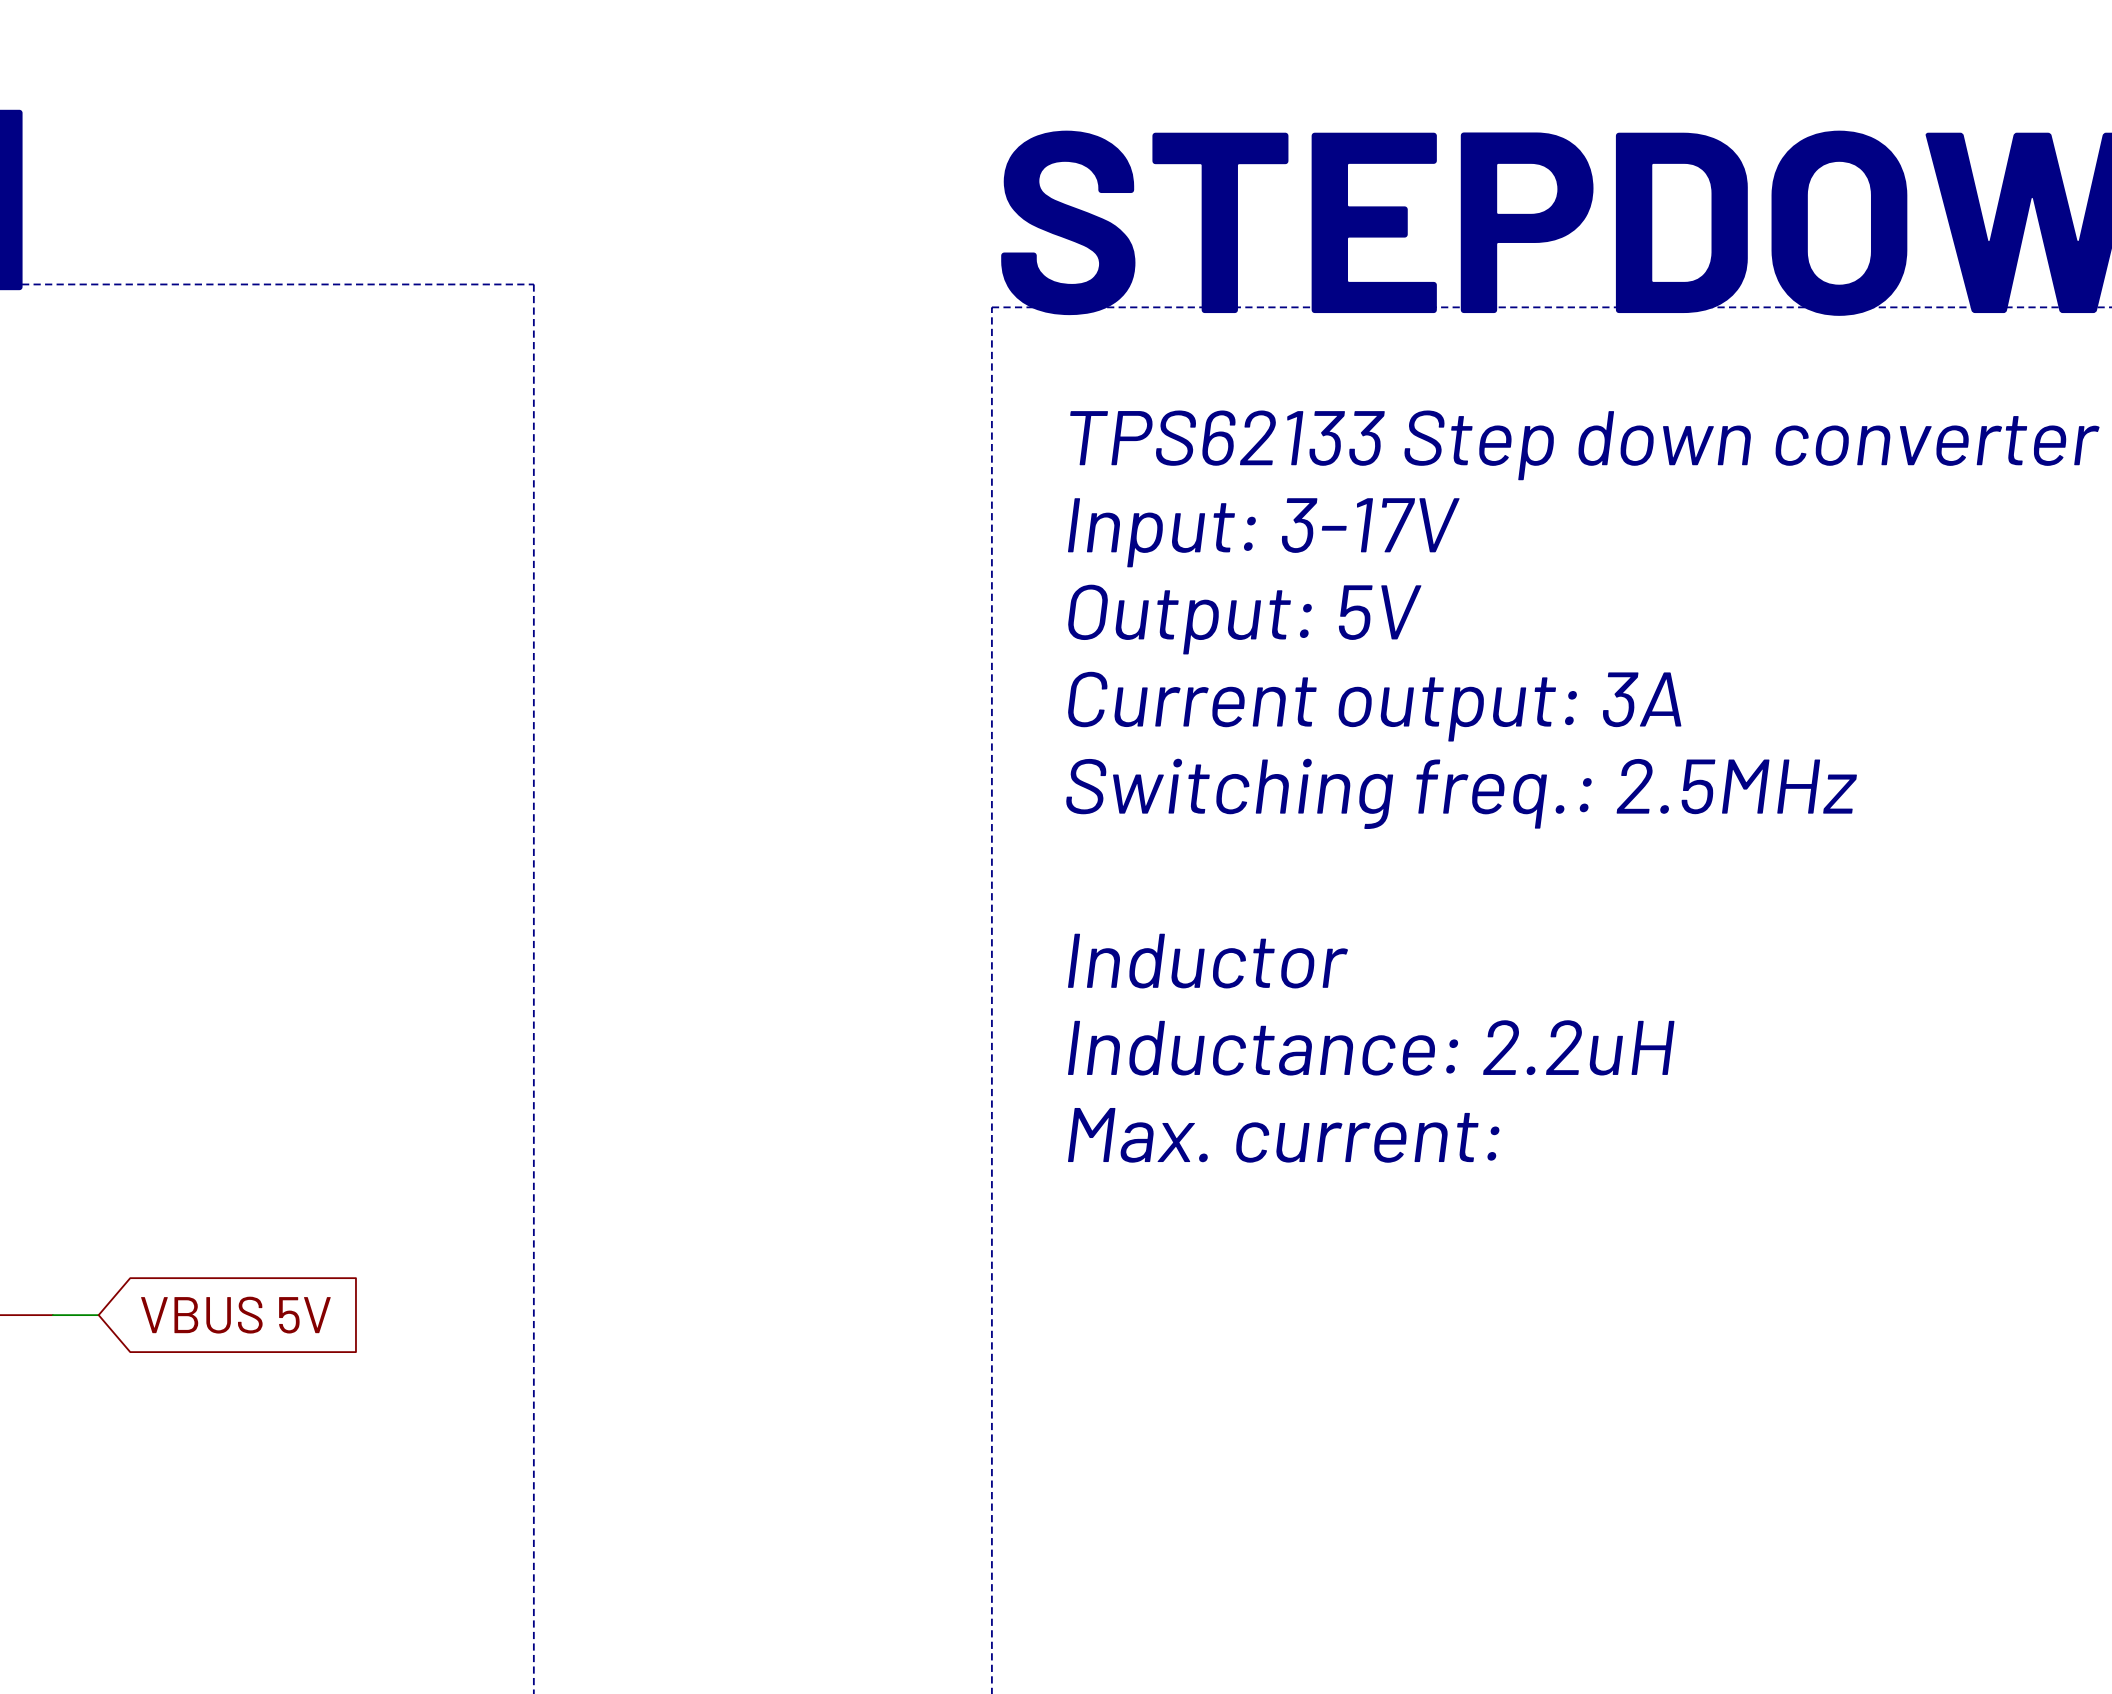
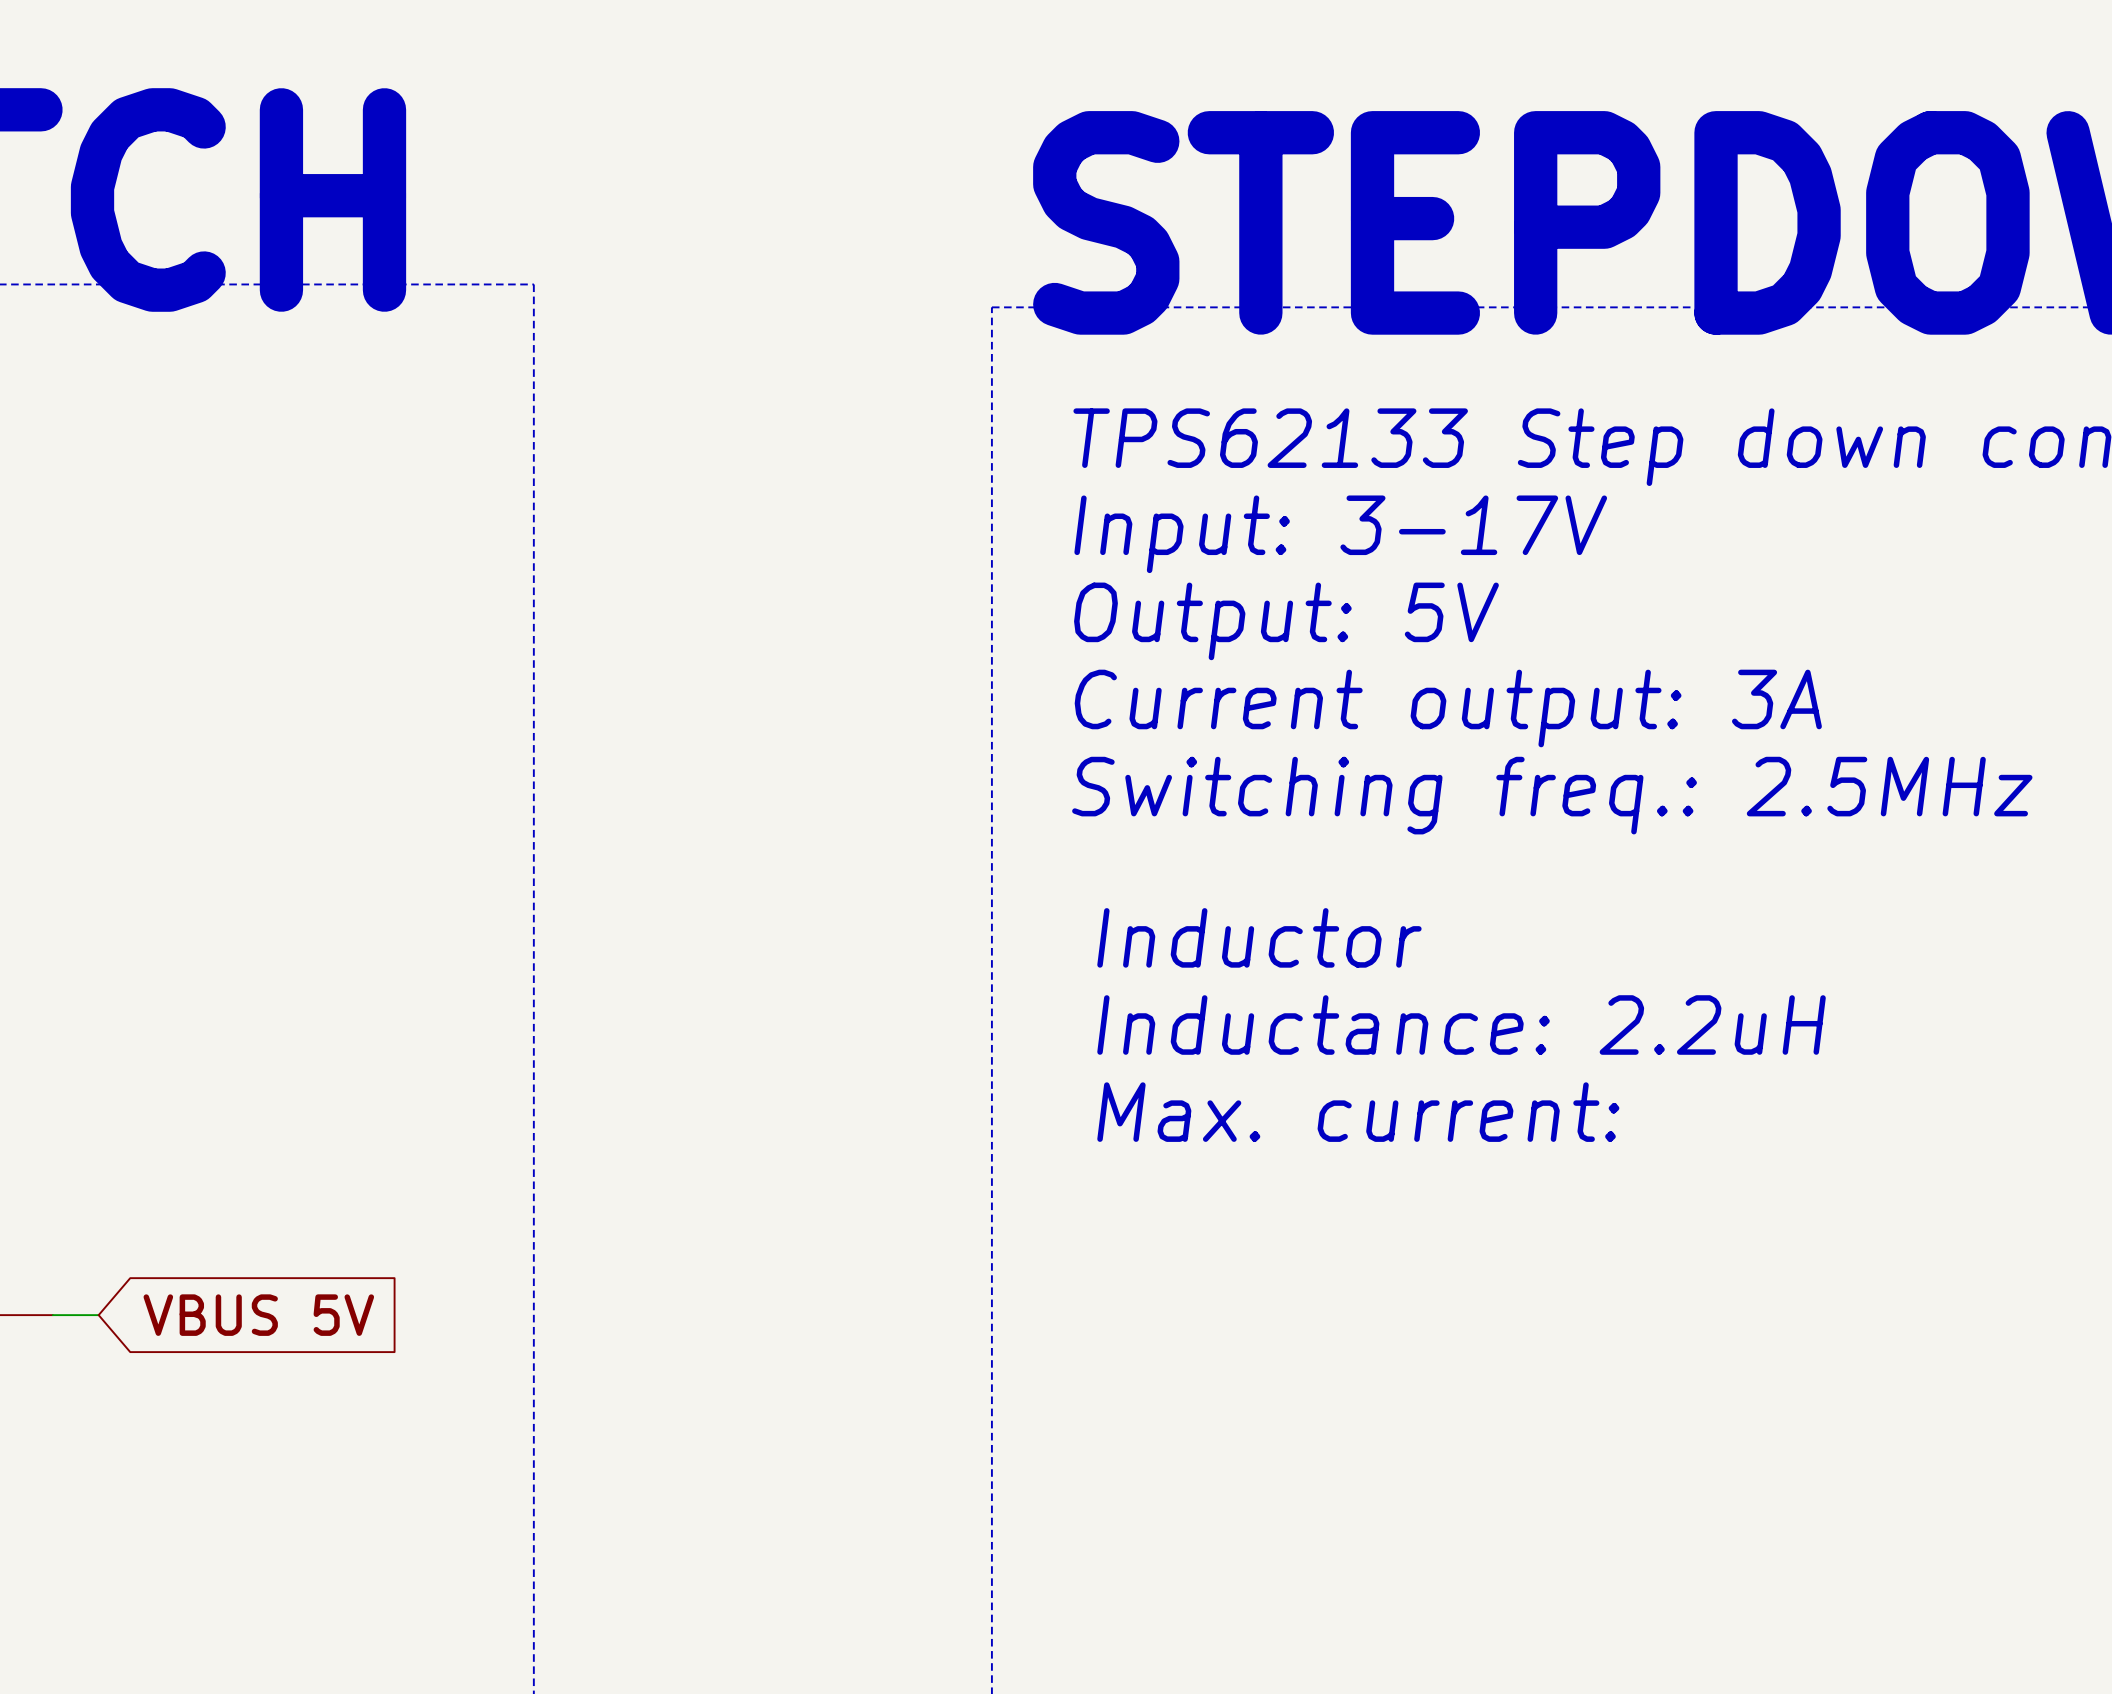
text position: Inductor (1208, 961) -> Inductor (1259, 937)
text position: Inductance: 2.2uH (1371, 1047) -> Inductance: 2.2uH (1461, 1025)
text position: Max. current: (1283, 1135) -> Max. current: (1358, 1112)

